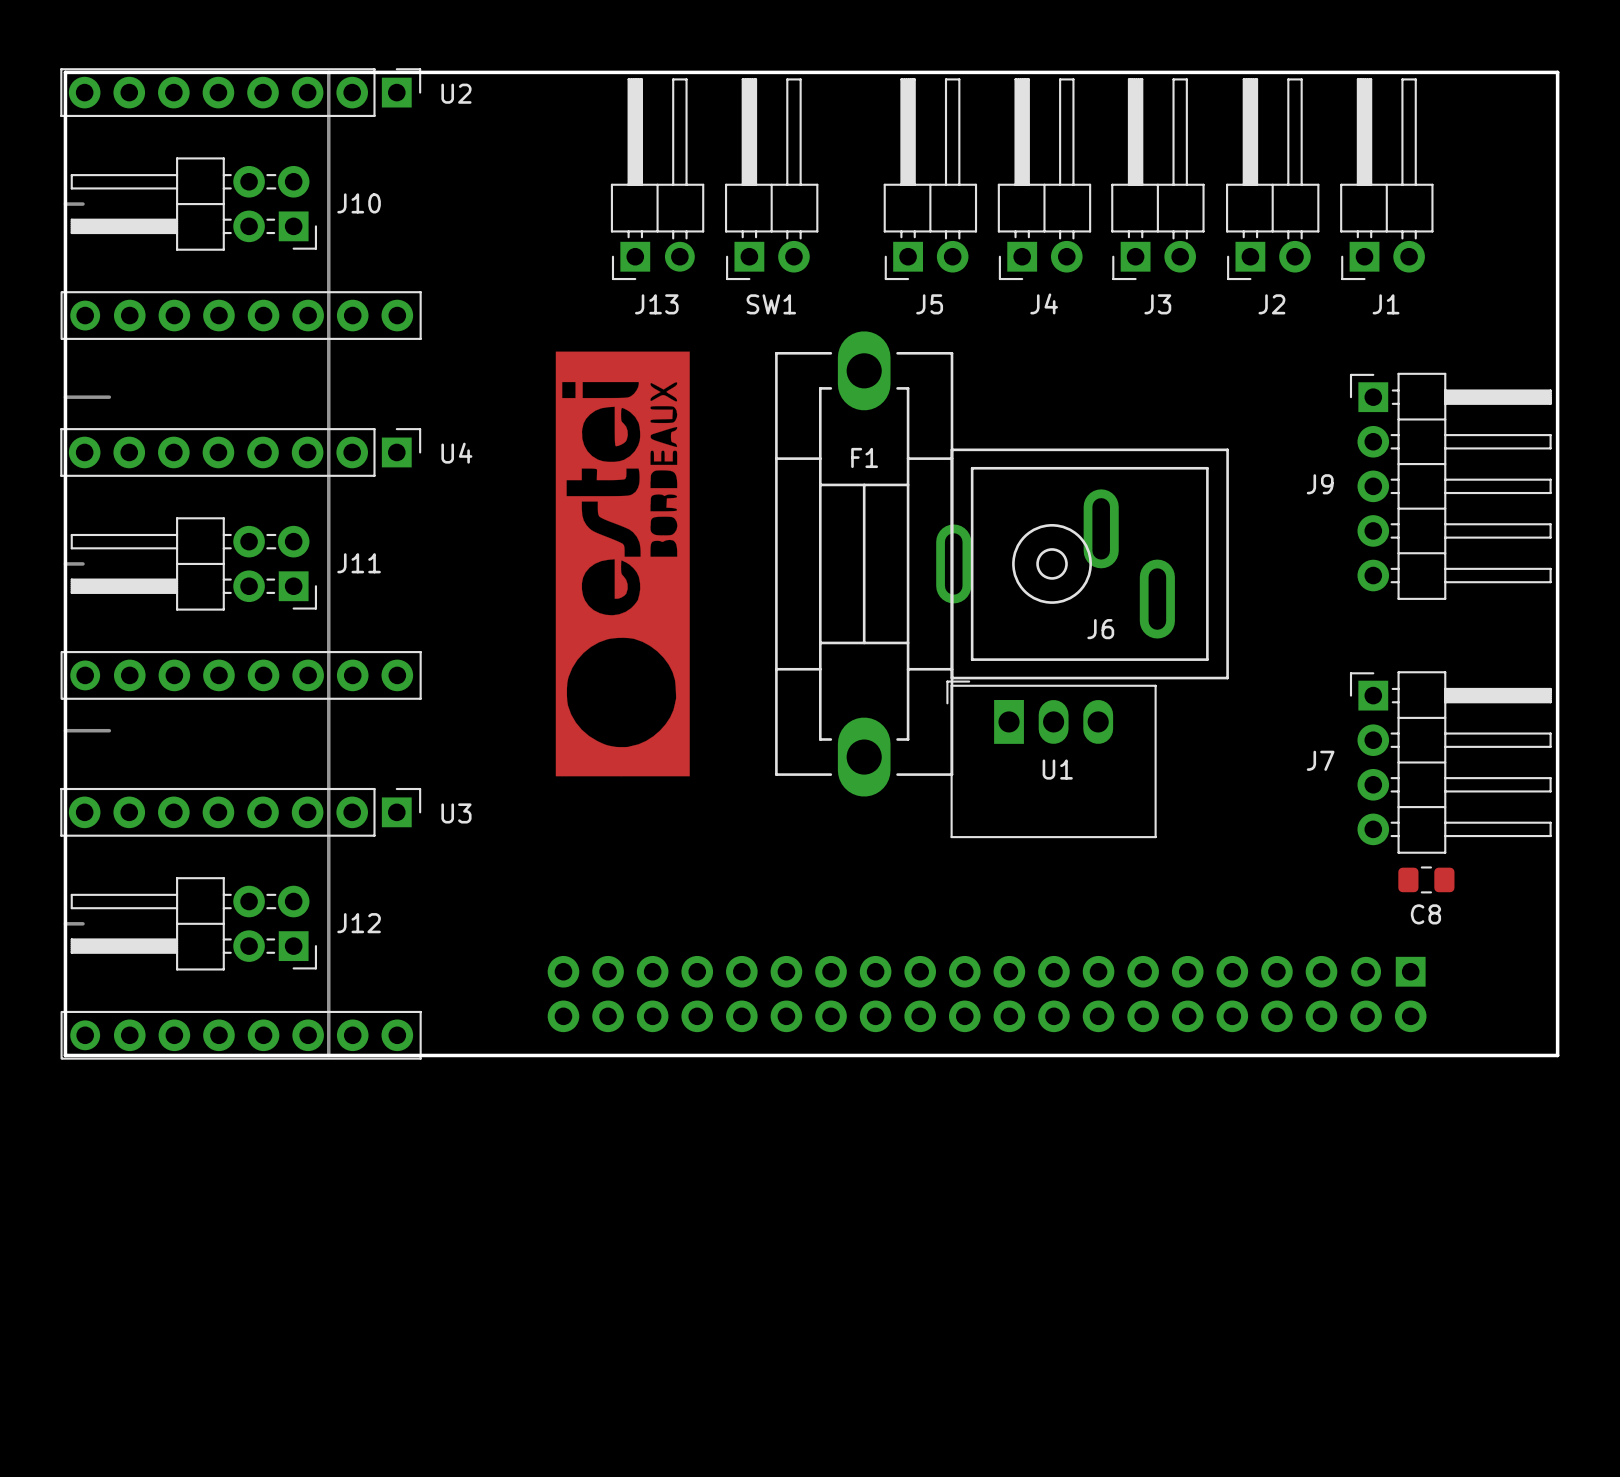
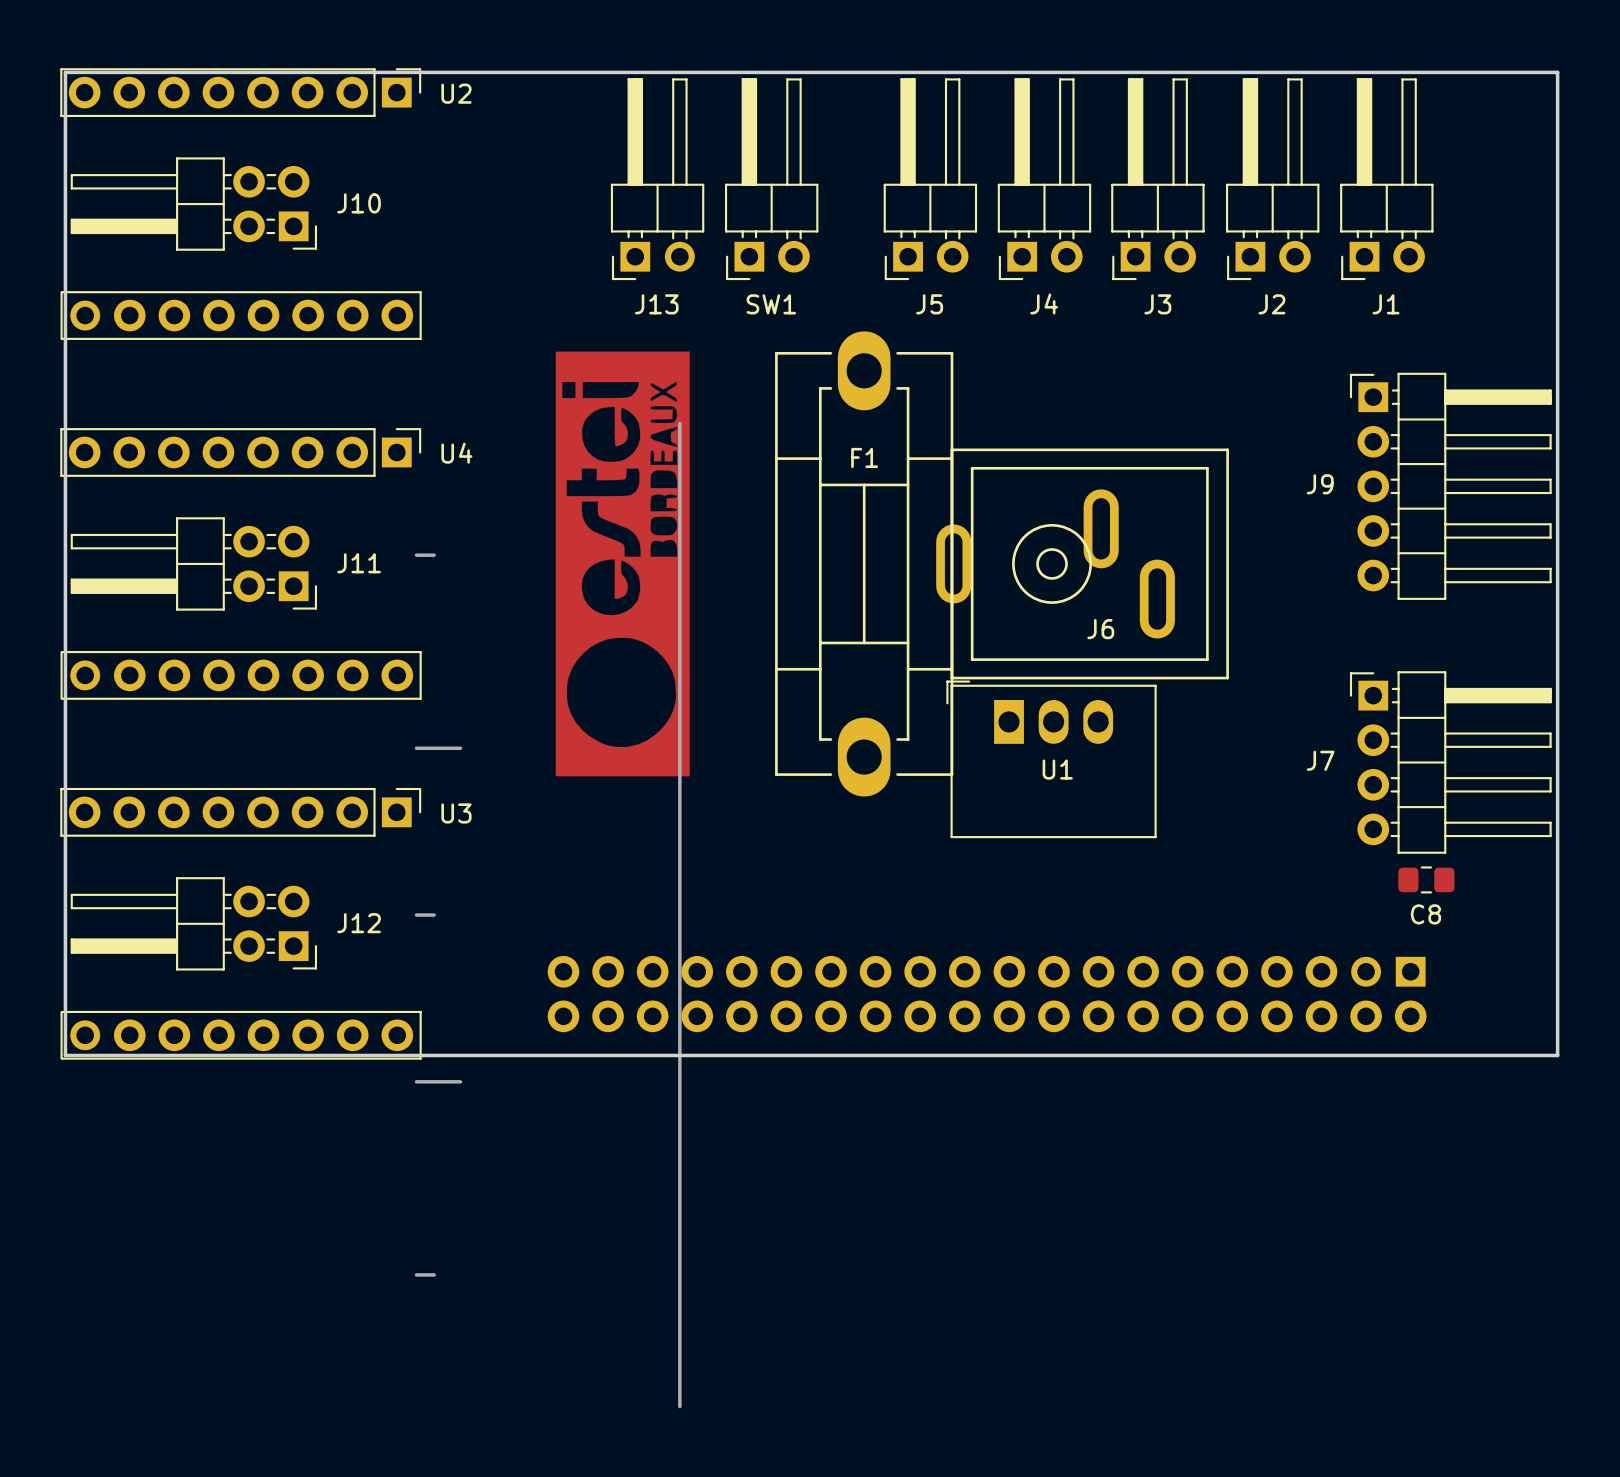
line: (328, 72) (328, 1055) -> none
line: (65, 204) (82, 204) -> none
line: (65, 397) (109, 397) -> none
line: none -> (679, 423) (679, 1406)
line: (65, 563) (82, 563) -> (416, 555) (434, 555)
line: (65, 730) (109, 730) -> (416, 748) (460, 748)
line: (65, 923) (82, 923) -> (416, 915) (434, 915)
line: none -> (416, 1081) (460, 1081)
line: none -> (416, 1274) (434, 1274)

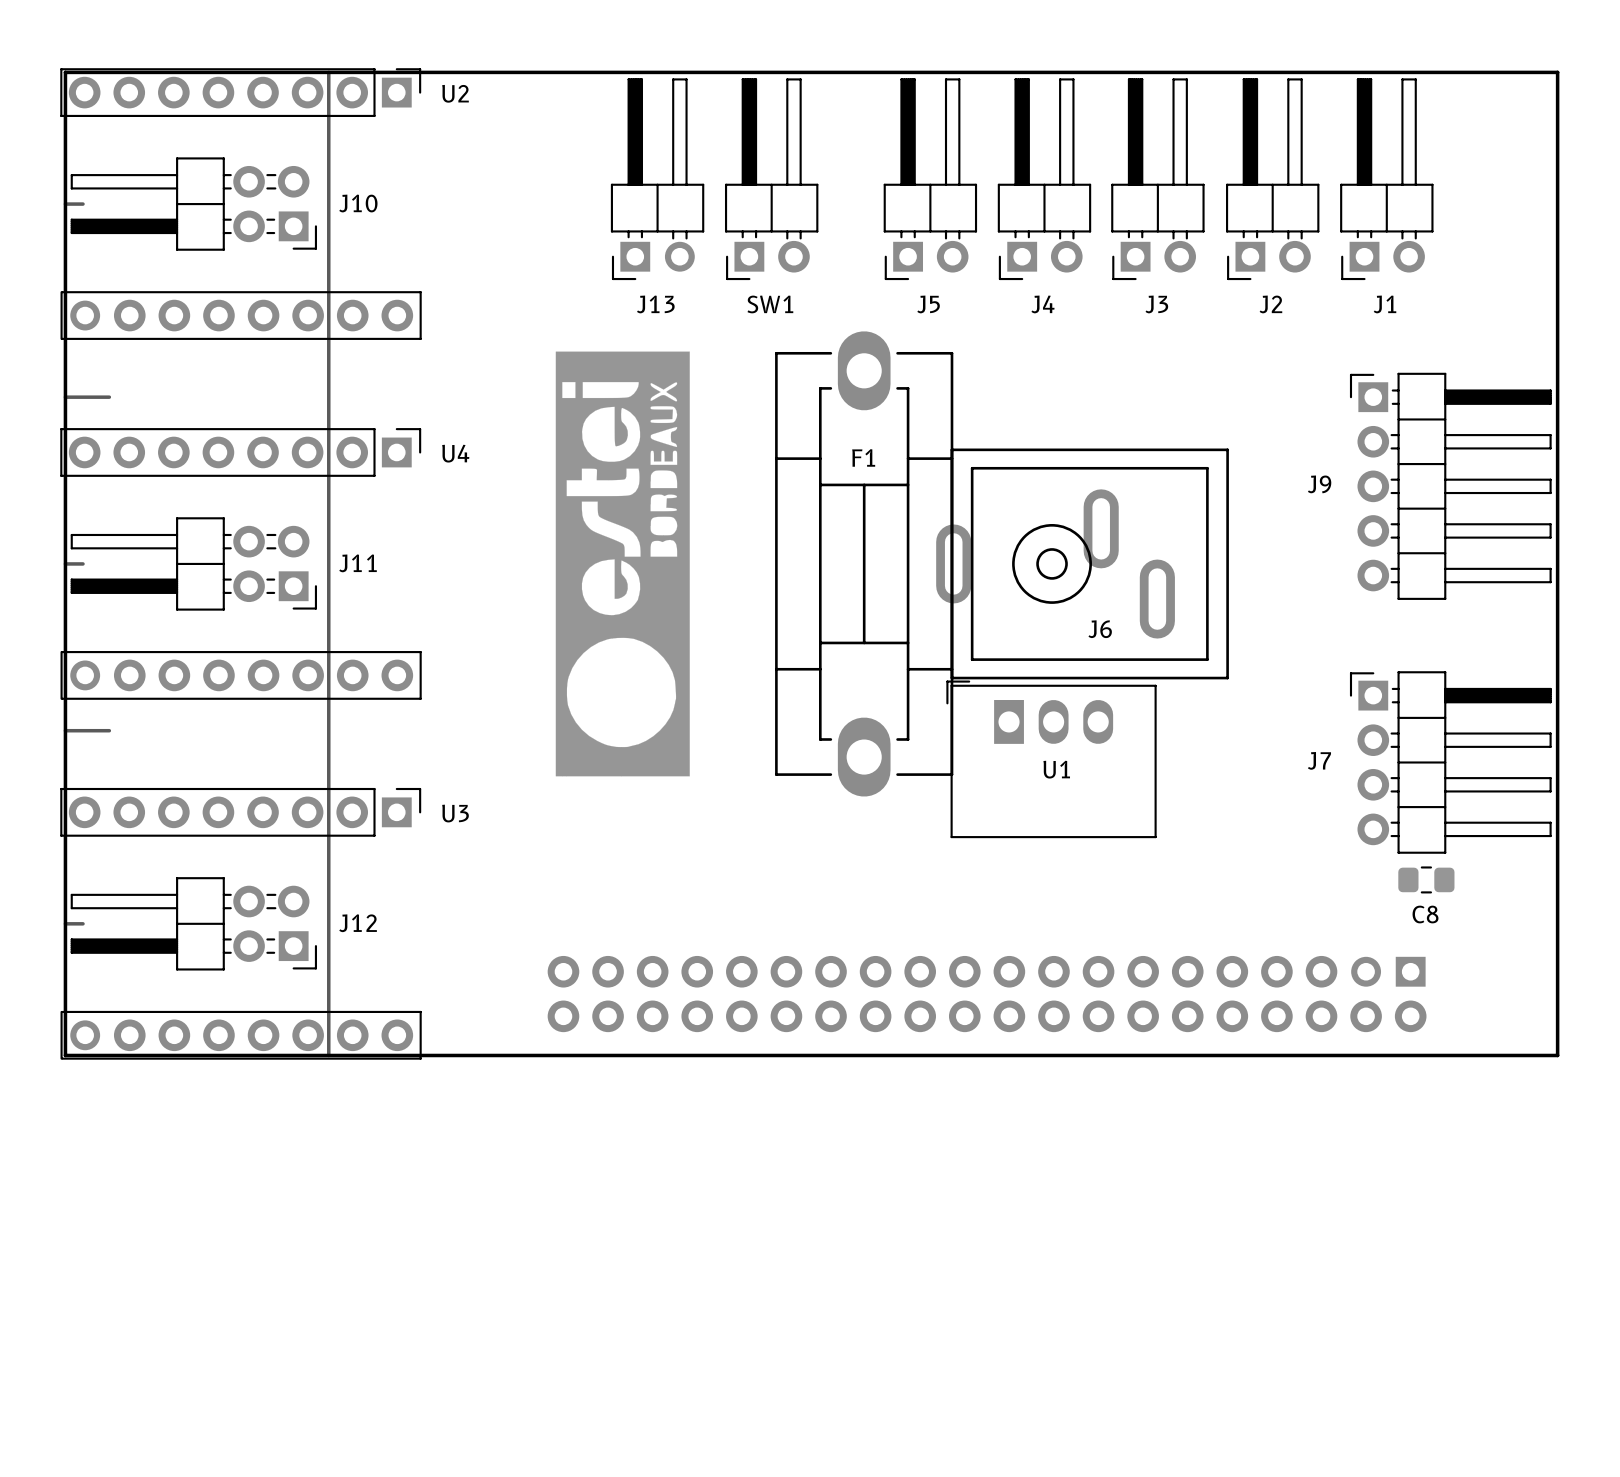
line: none -> (328, 72) (328, 1055)
line: none -> (65, 204) (82, 204)
line: none -> (65, 397) (109, 397)
line: (679, 423) (679, 1406) -> none
line: (416, 555) (434, 555) -> (65, 563) (82, 563)
line: (416, 748) (460, 748) -> (65, 730) (109, 730)
line: (416, 915) (434, 915) -> (65, 923) (82, 923)
line: (416, 1081) (460, 1081) -> none
line: (416, 1274) (434, 1274) -> none

